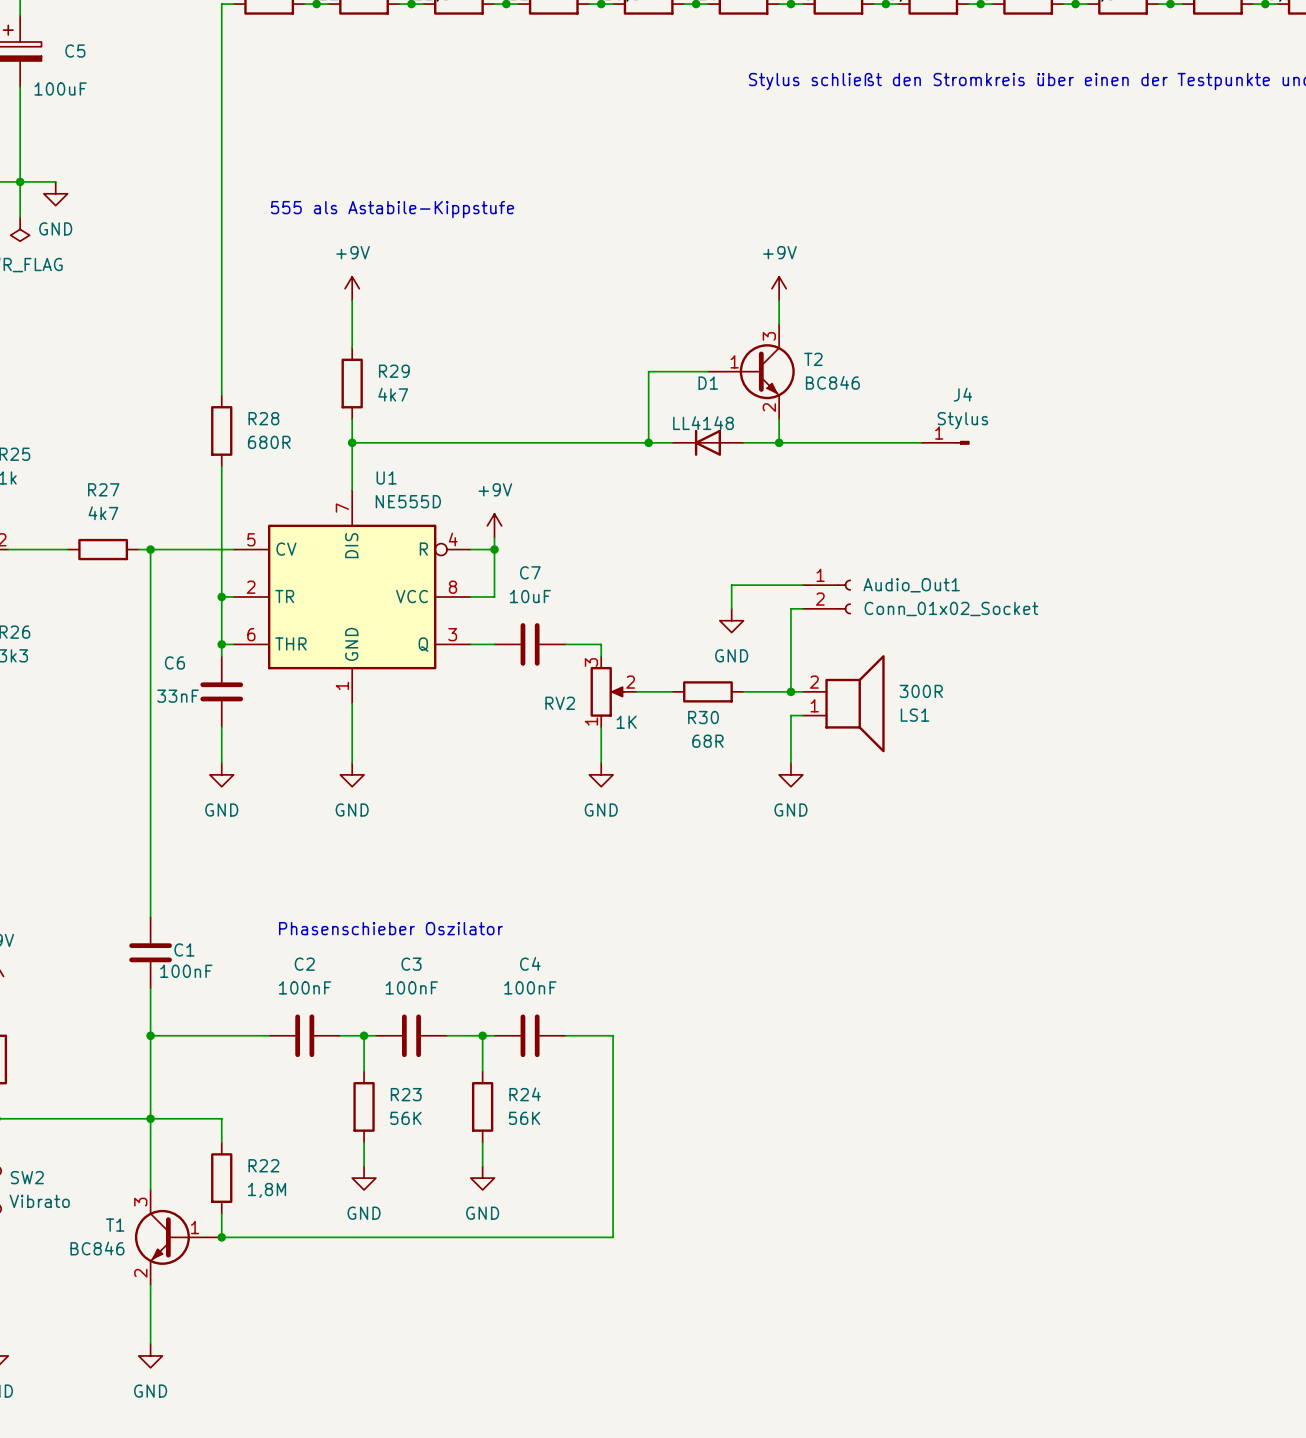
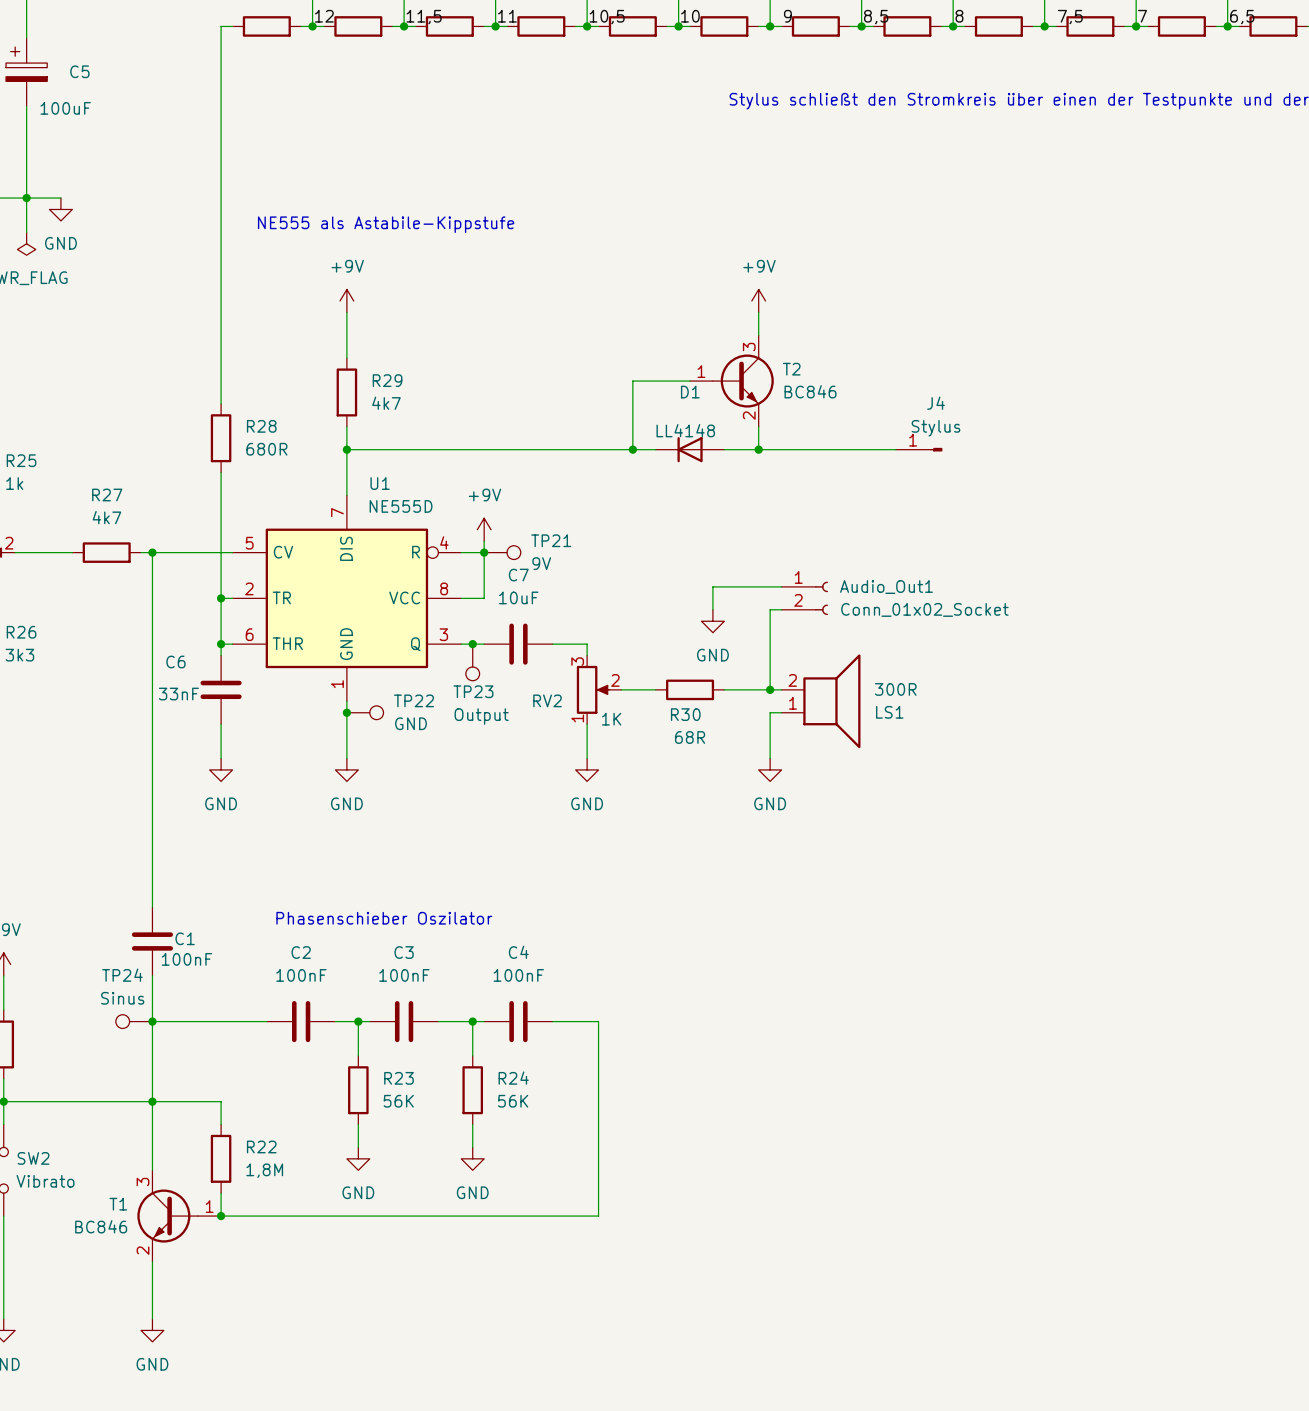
text: 555 als Astabile-Kippstufe (392, 209) -> NE555 als Astabile-Kippstufe (386, 224)
T2 symbol: [707, 324, 795, 420] -> [690, 335, 774, 427]
TP21: none -> 9V (502, 552)
junction: none -> (472, 644)
TP23: none -> Output (472, 662)
junction: none -> (346, 712)
TP22: none -> GND (365, 712)
TP24: none -> Sinus (134, 1021)
T1 symbol: [134, 1189, 222, 1285] -> [137, 1170, 222, 1262]

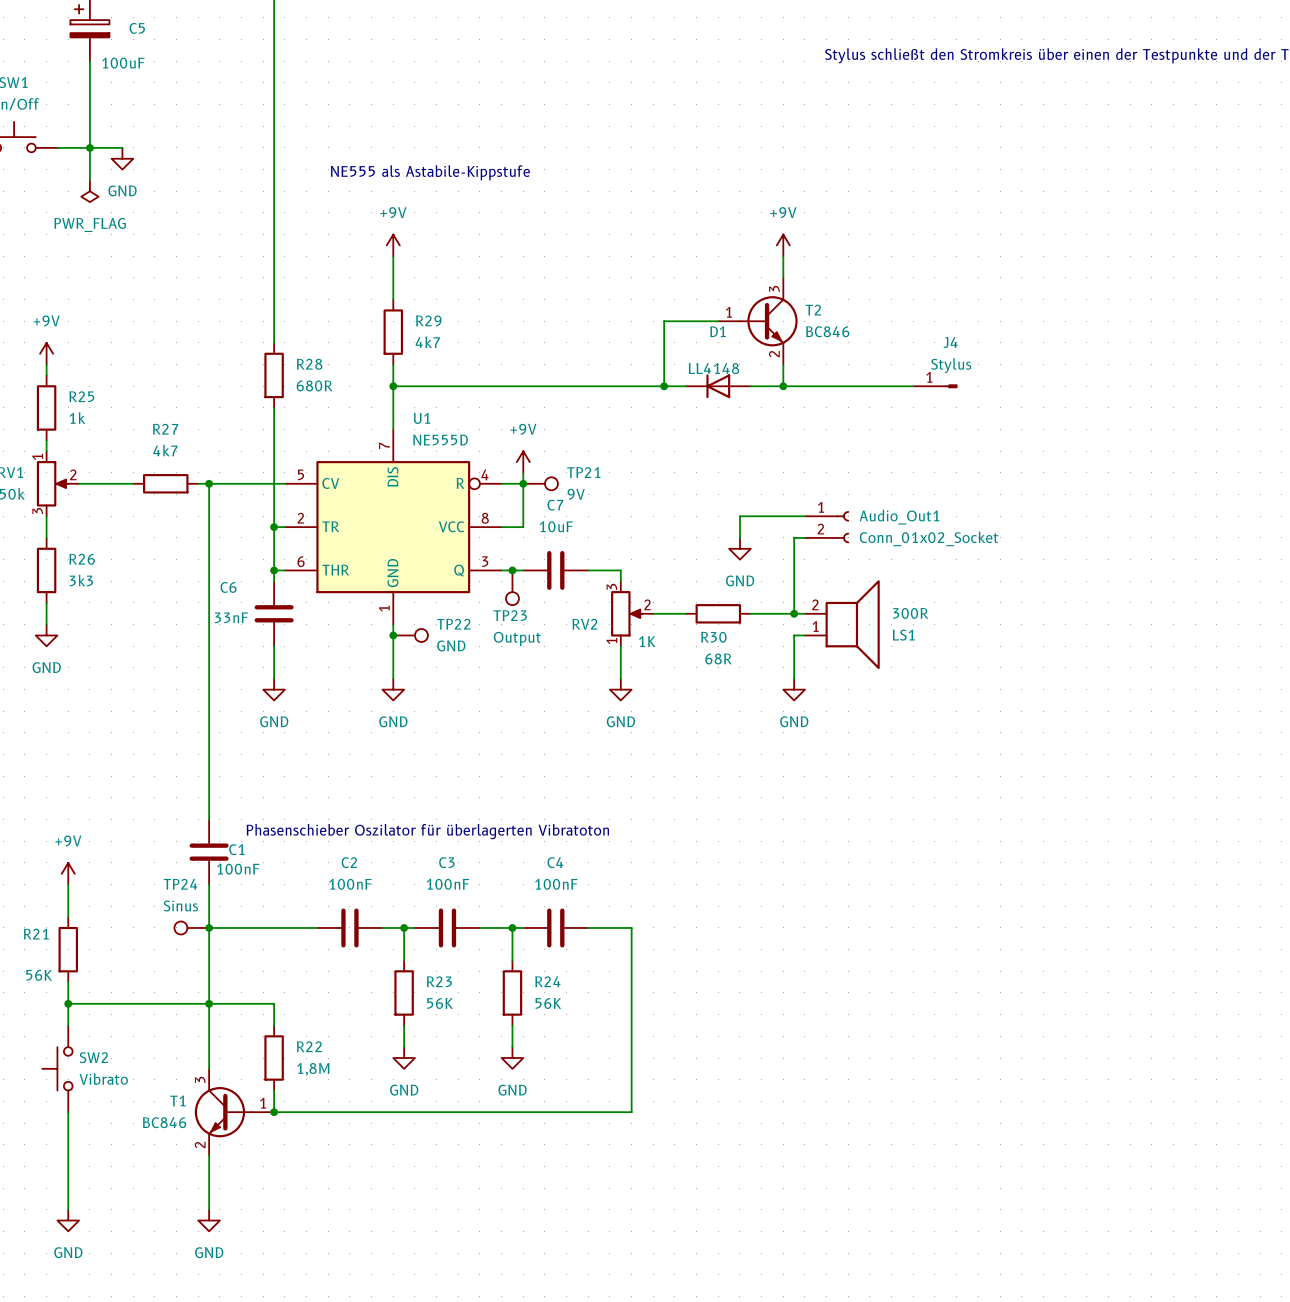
text: Phasenschieber Oszilator (384, 918) -> Phasenschieber Oszilator für überlagerten Vibratoton (427, 831)

